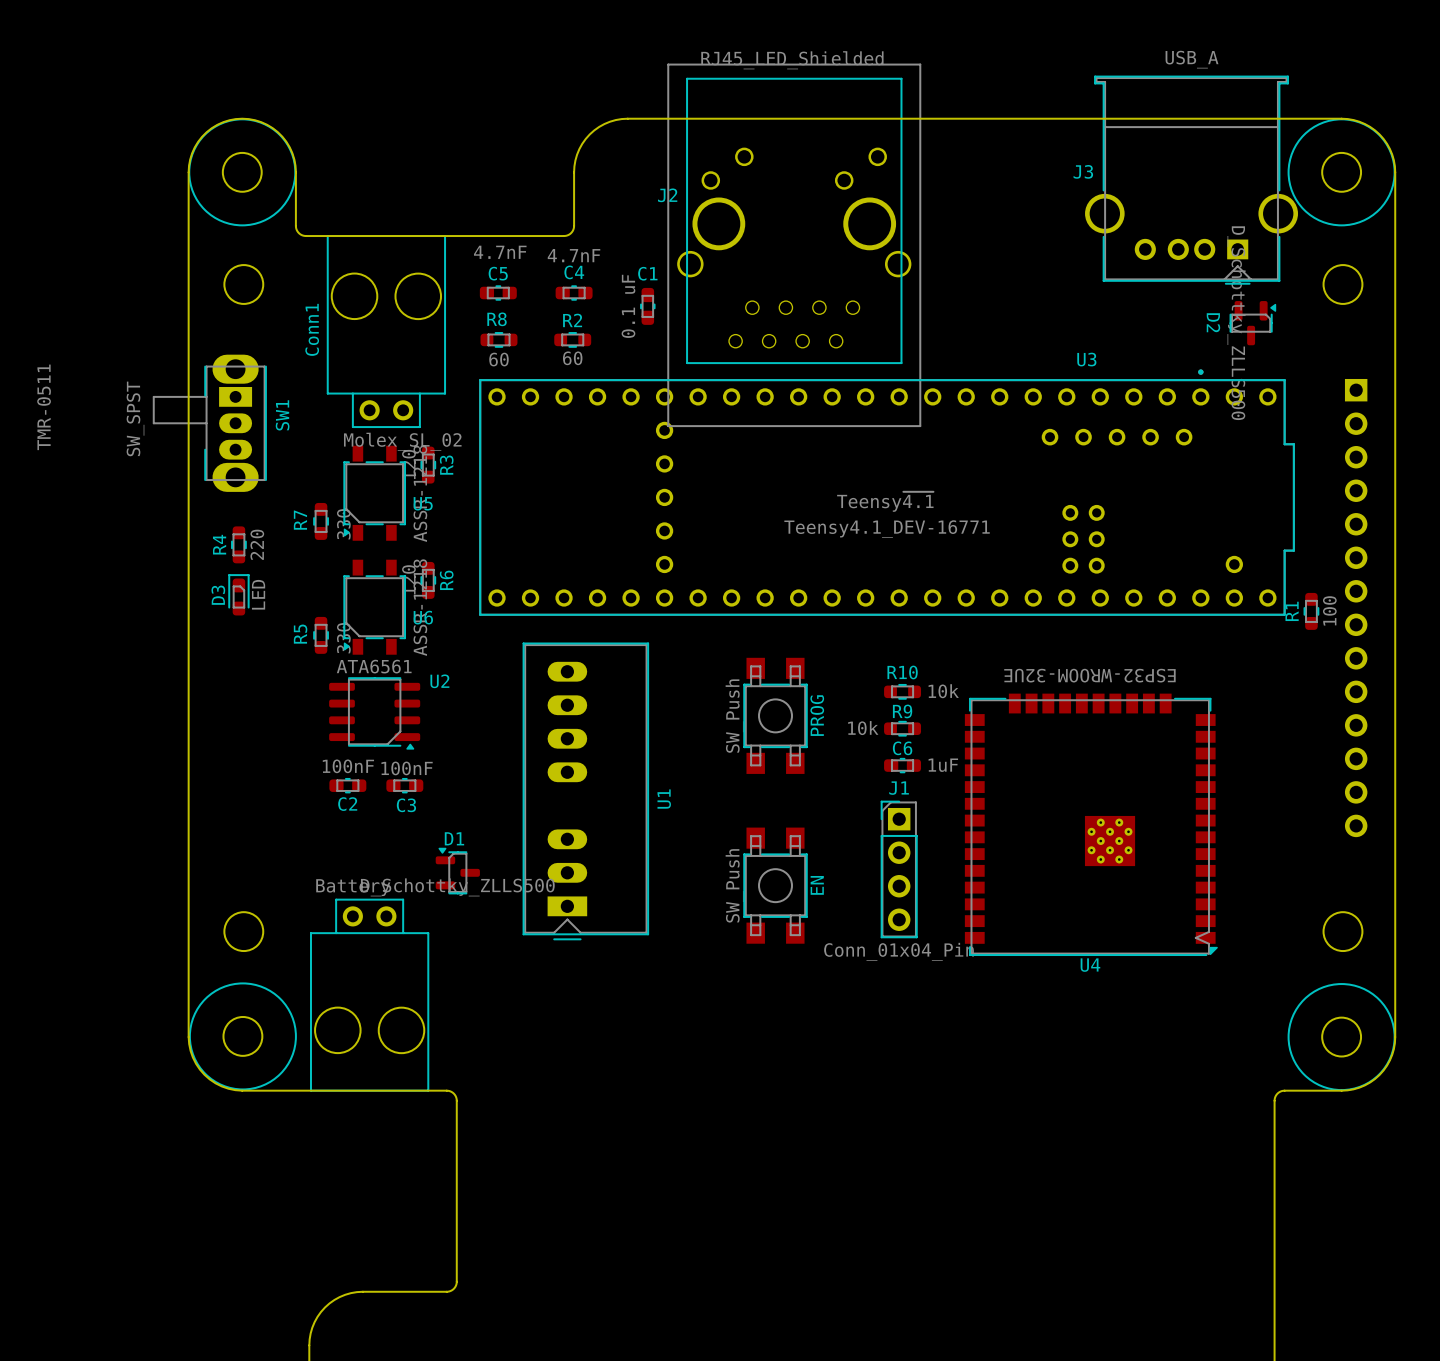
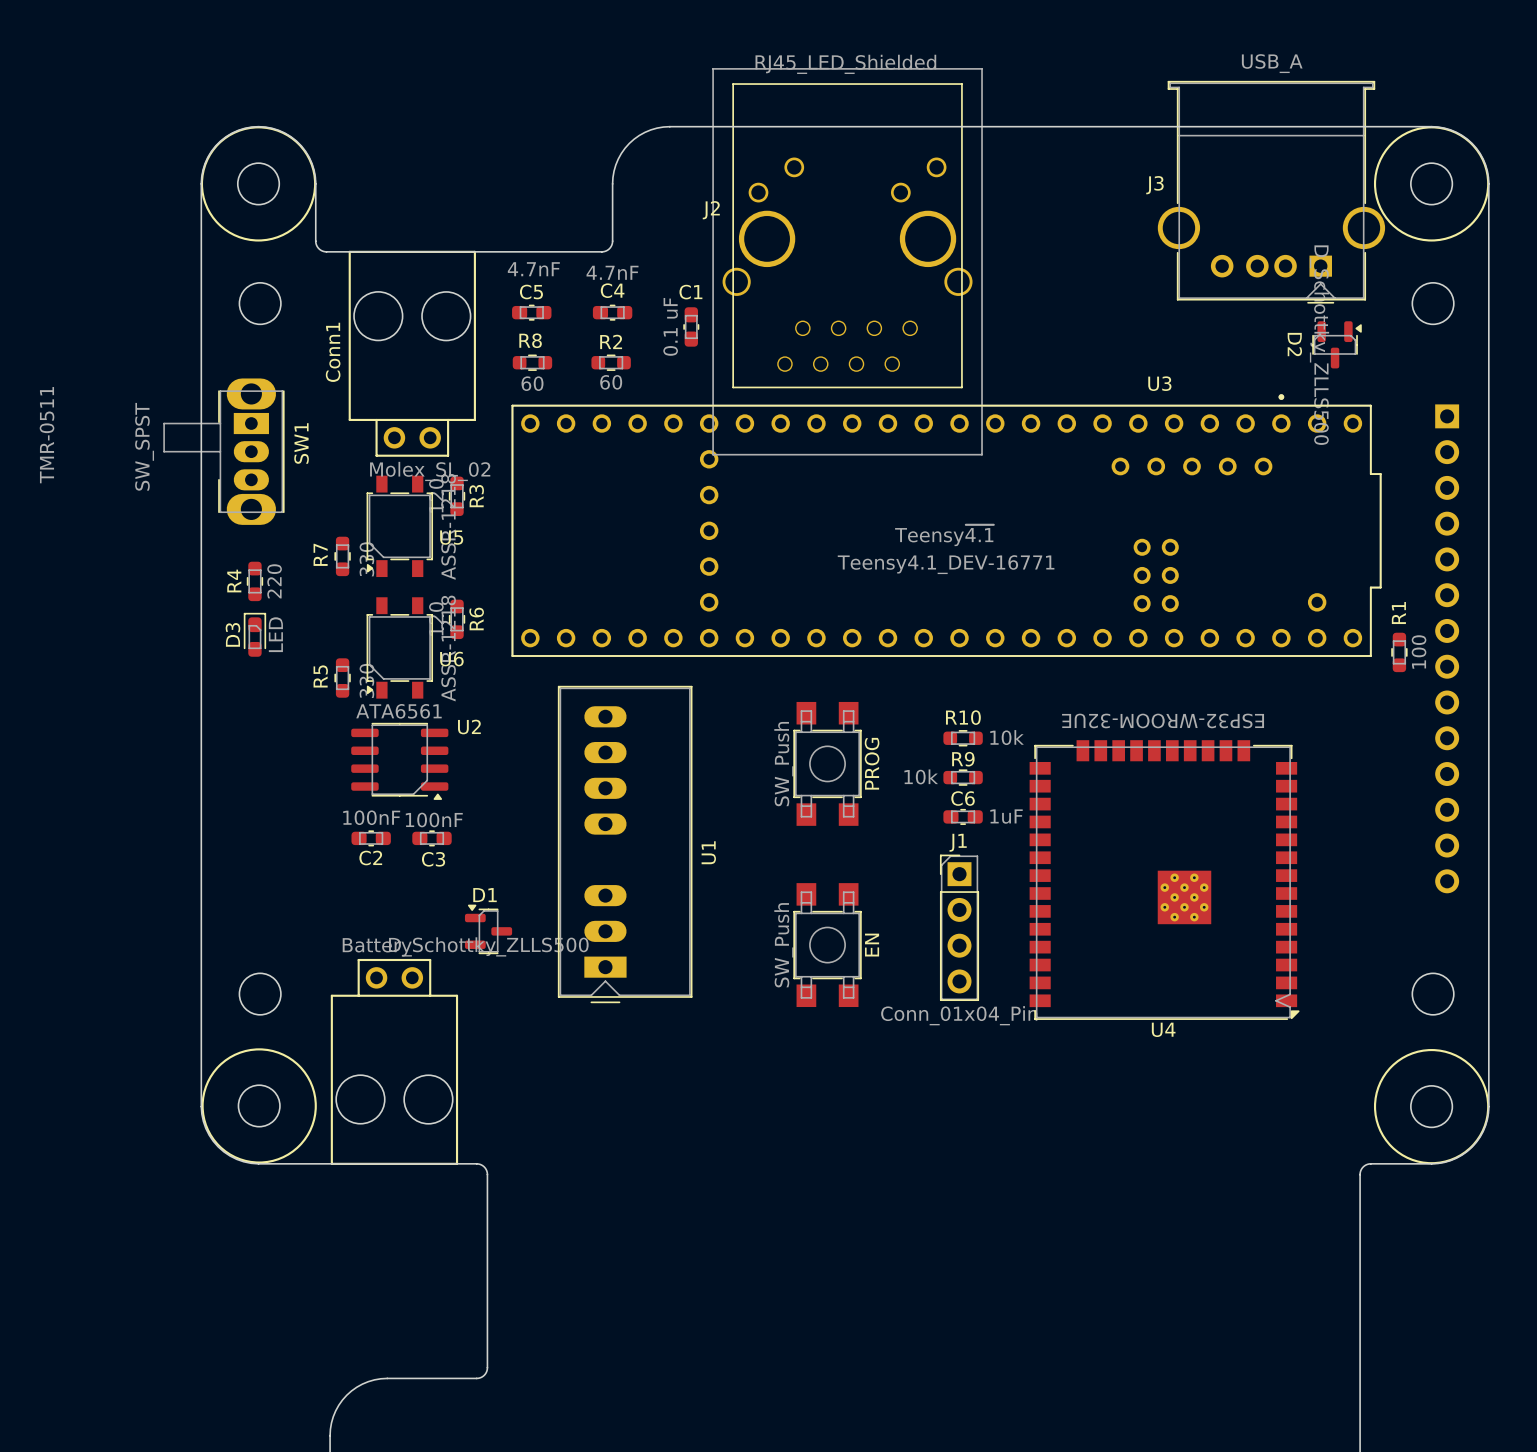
R1 name position: R1 (1292, 611) -> R1 (1398, 613)

